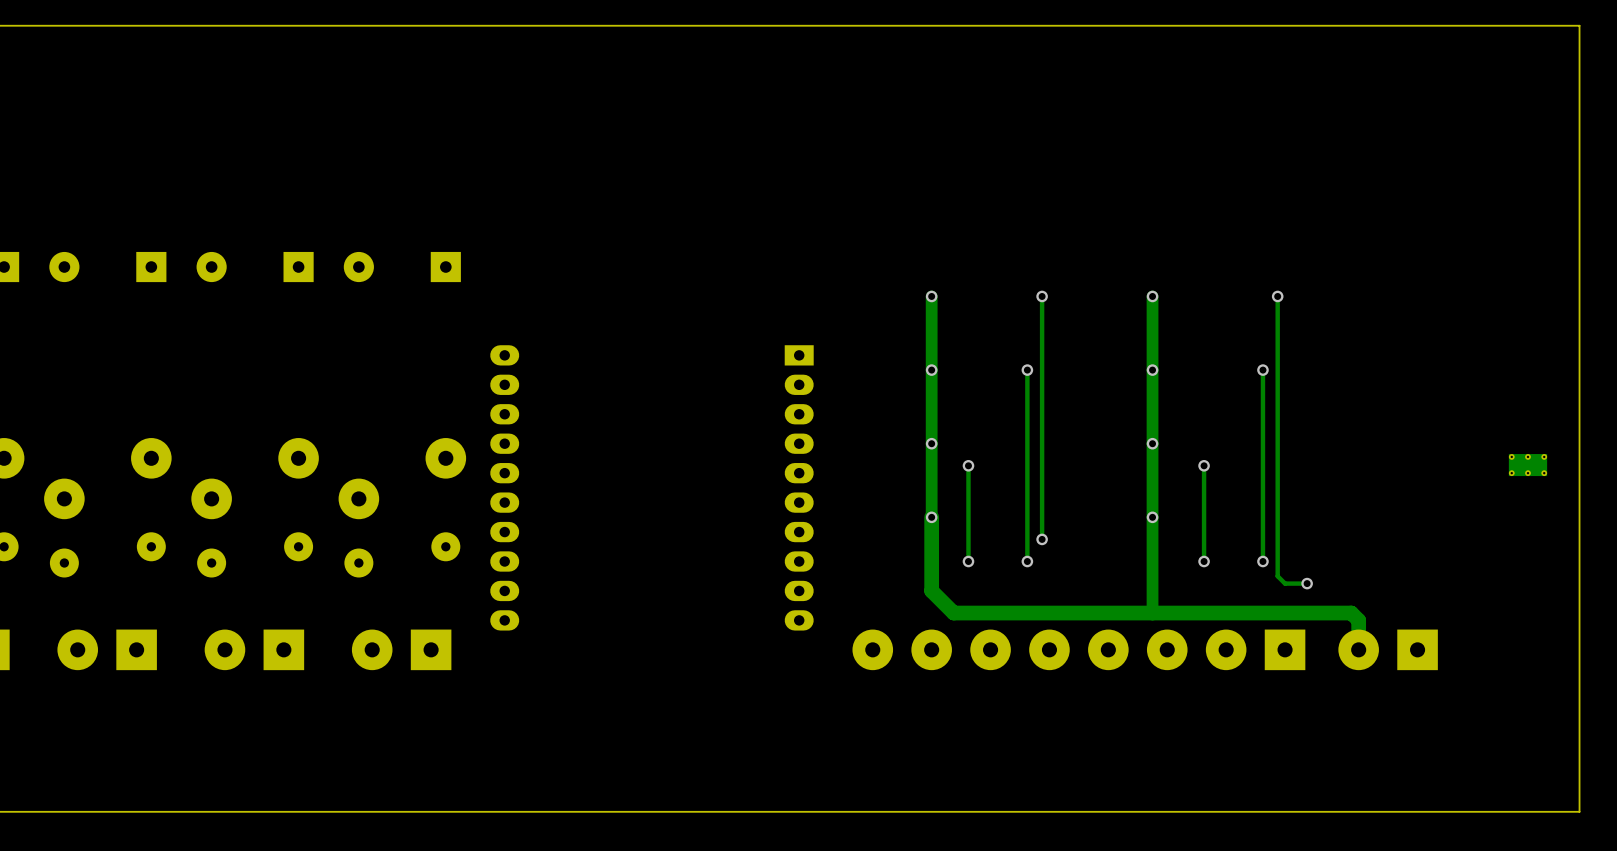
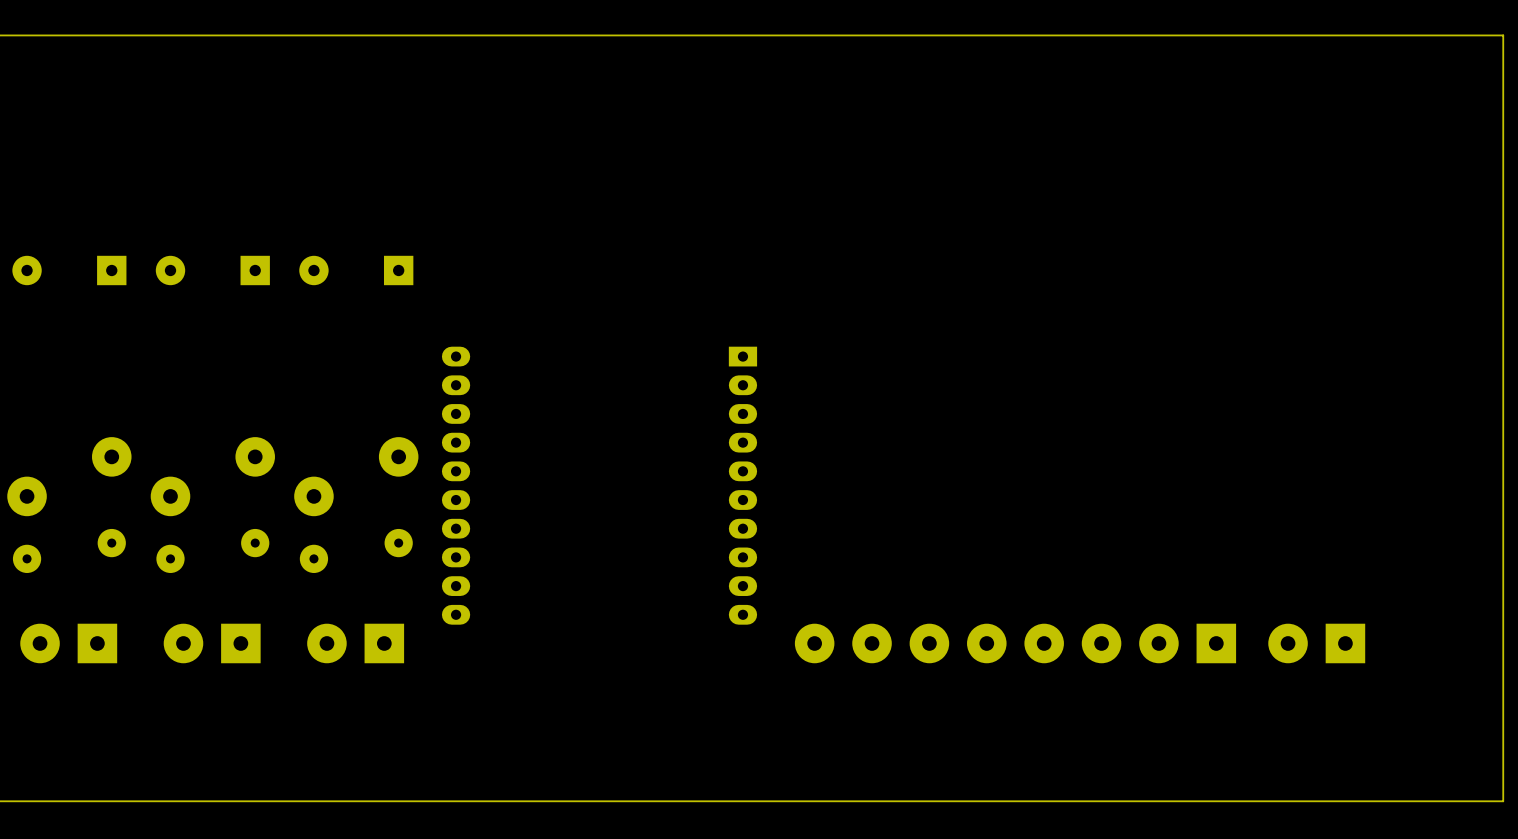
track: (931, 296) (931, 590) (953, 613) (1351, 613) (1358, 620) (1358, 649) -> none
via: (931, 296) -> none
track: (1042, 296) (1042, 539) -> none
via: (1042, 296) -> none
track: (1152, 296) (1152, 613) -> none
via: (1152, 296) -> none
track: (1277, 296) (1277, 576) (1285, 583) (1307, 583) -> none
via: (1277, 296) -> none
via: (931, 370) -> none
track: (1027, 370) (1027, 561) -> none
via: (1027, 370) -> none
via: (1152, 370) -> none
track: (1262, 370) (1262, 561) -> none
via: (1262, 370) -> none
via: (931, 443) -> none
via: (1152, 443) -> none
track: (968, 465) (968, 561) -> none
via: (968, 465) -> none
track: (1204, 465) (1204, 561) -> none
via: (1204, 465) -> none
part: (1528, 465) -> none
via: (931, 517) -> none
via: (1152, 517) -> none
via: (1042, 539) -> none
via: (968, 561) -> none
via: (1027, 561) -> none
via: (1204, 561) -> none
via: (1262, 561) -> none
via: (1307, 583) -> none

